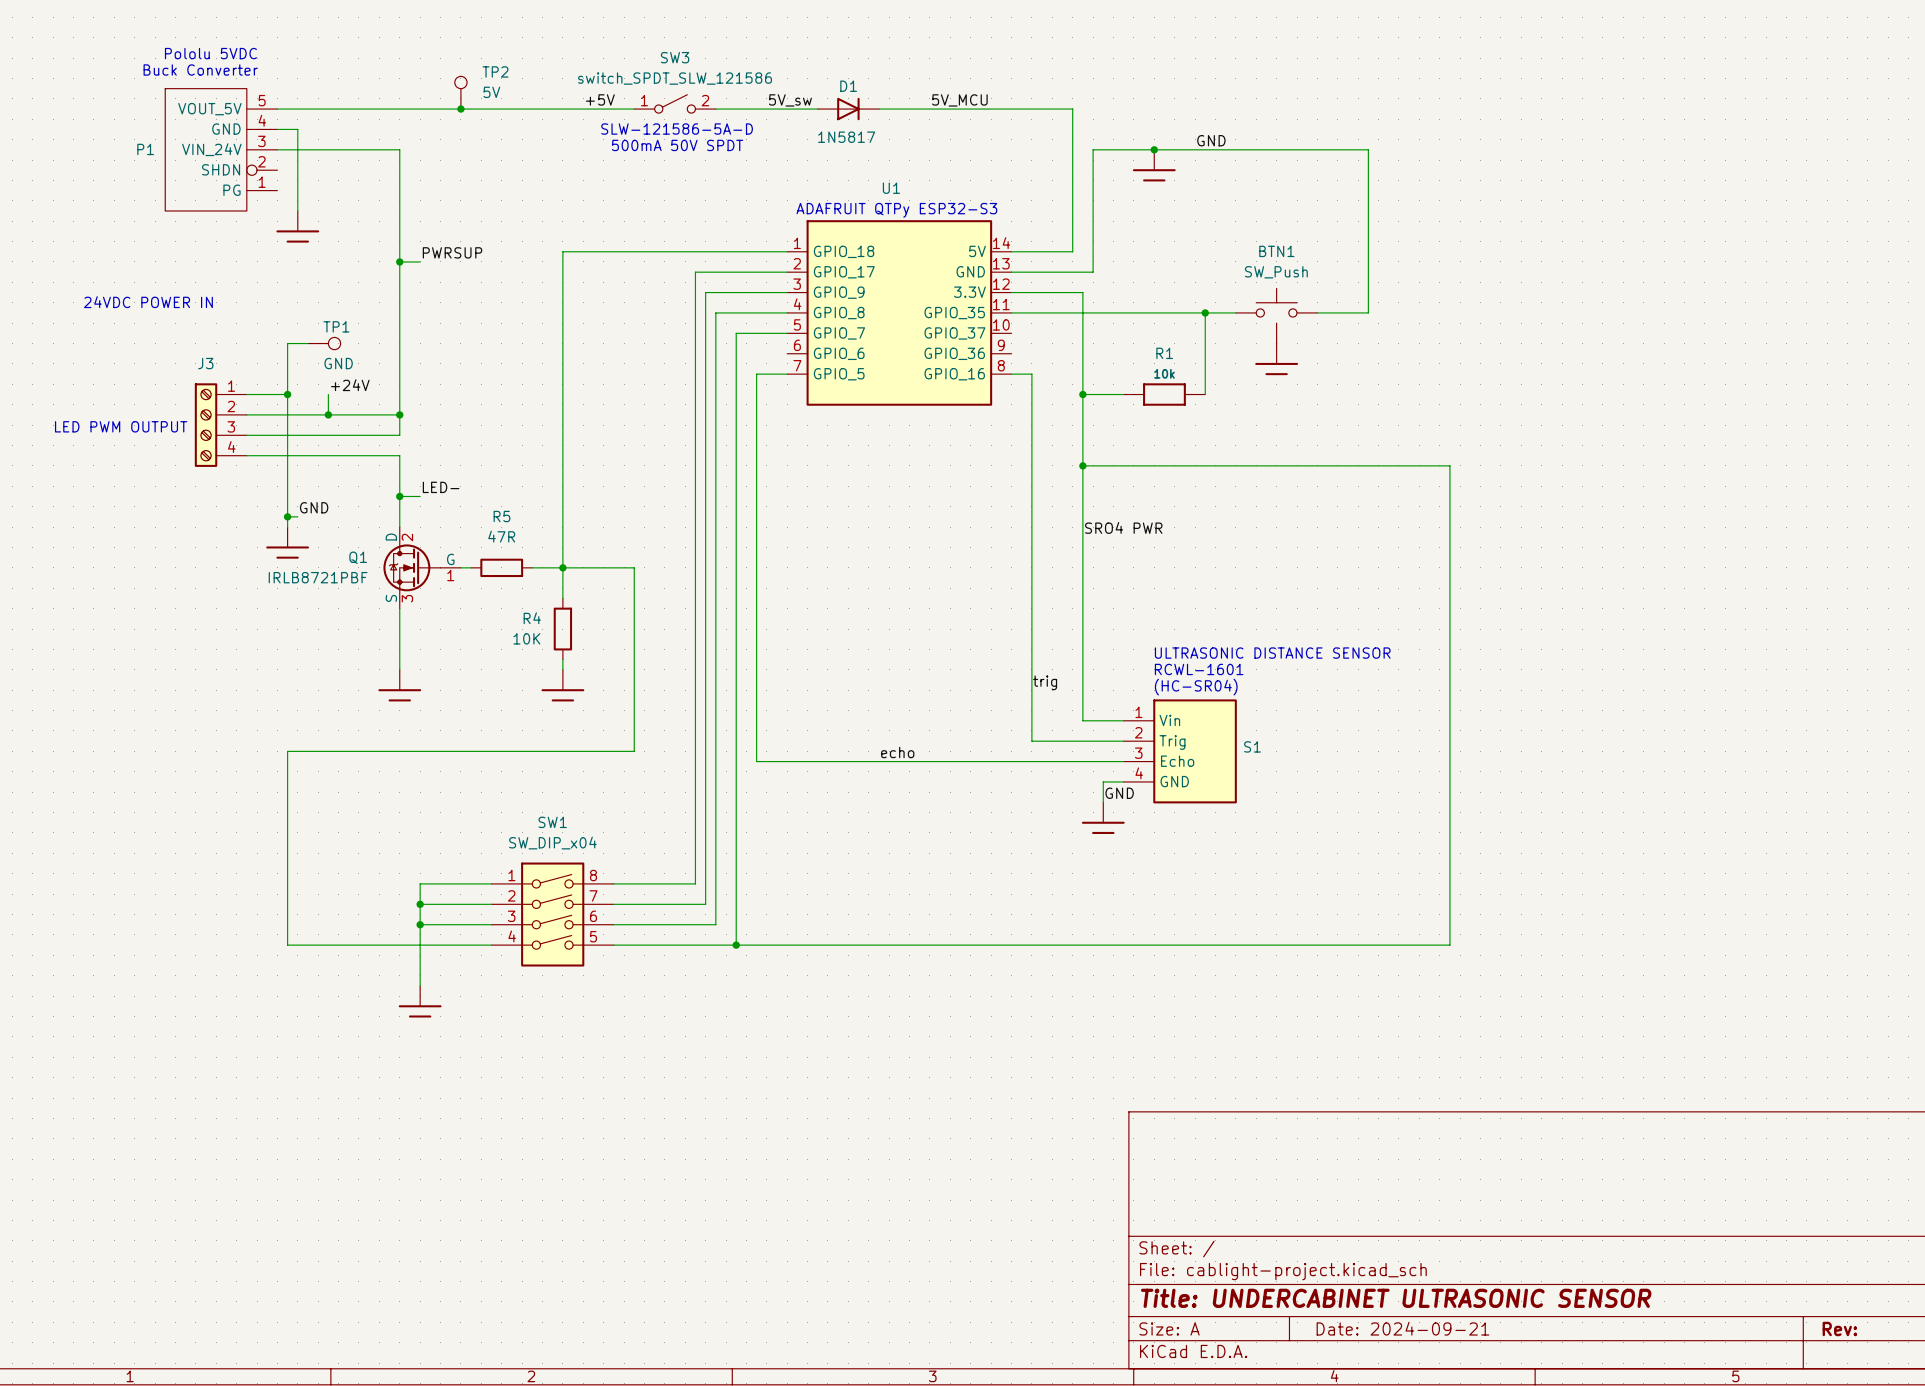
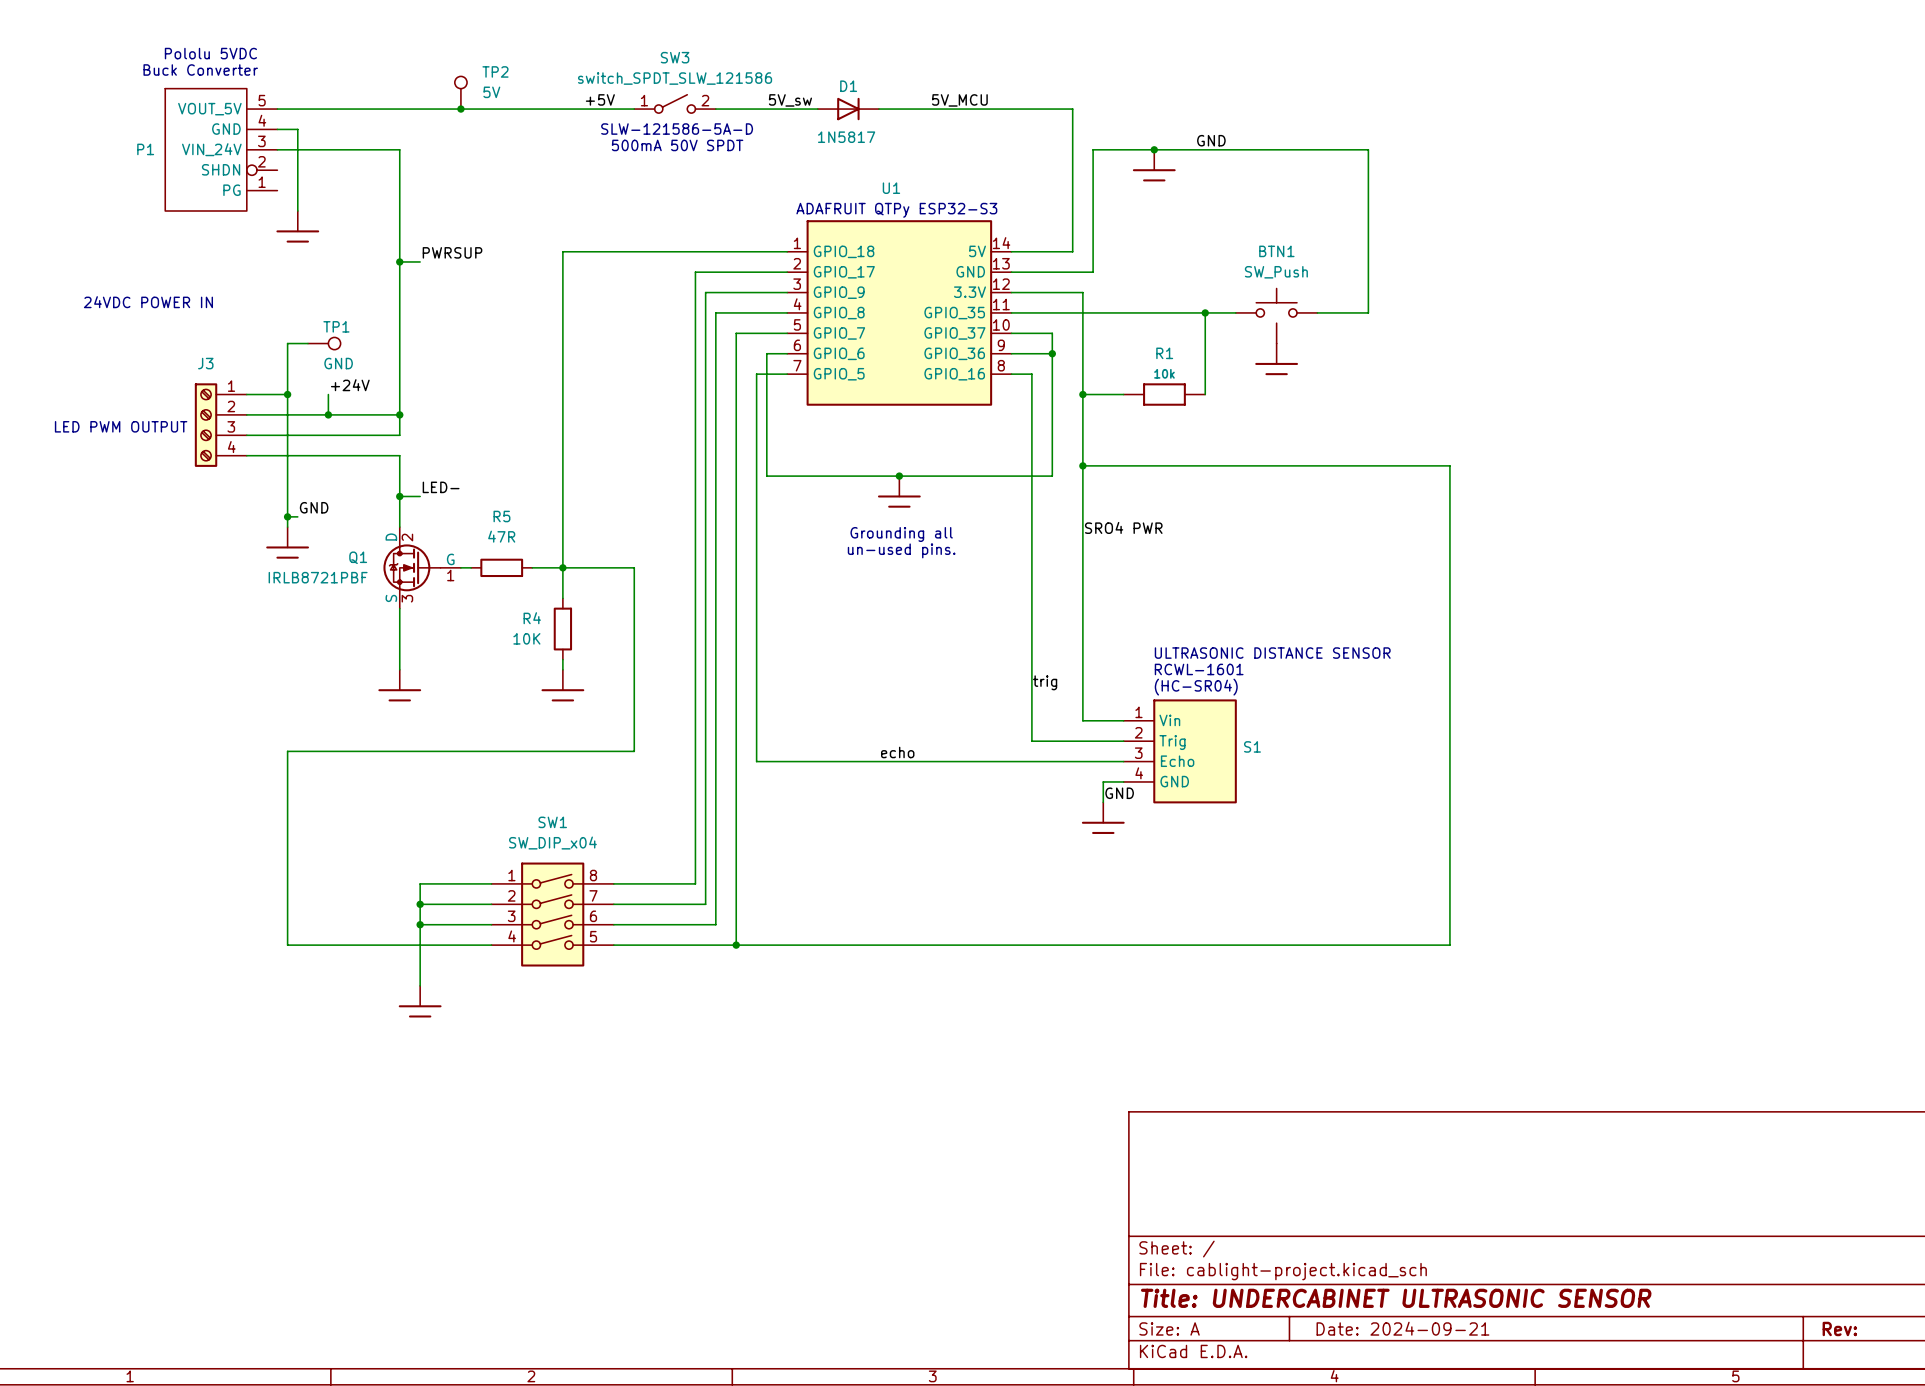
wire: none -> (1011, 333) (1052, 333) (1052, 476) (766, 476) (766, 353) (787, 353)
wire: none -> (1011, 353) (1052, 353)
junction: none -> (1052, 353)
junction: none -> (899, 476)
power symbol: none -> (899, 491)
text: none -> Grounding all (901, 534)
text: none -> un-used pins. (901, 550)

